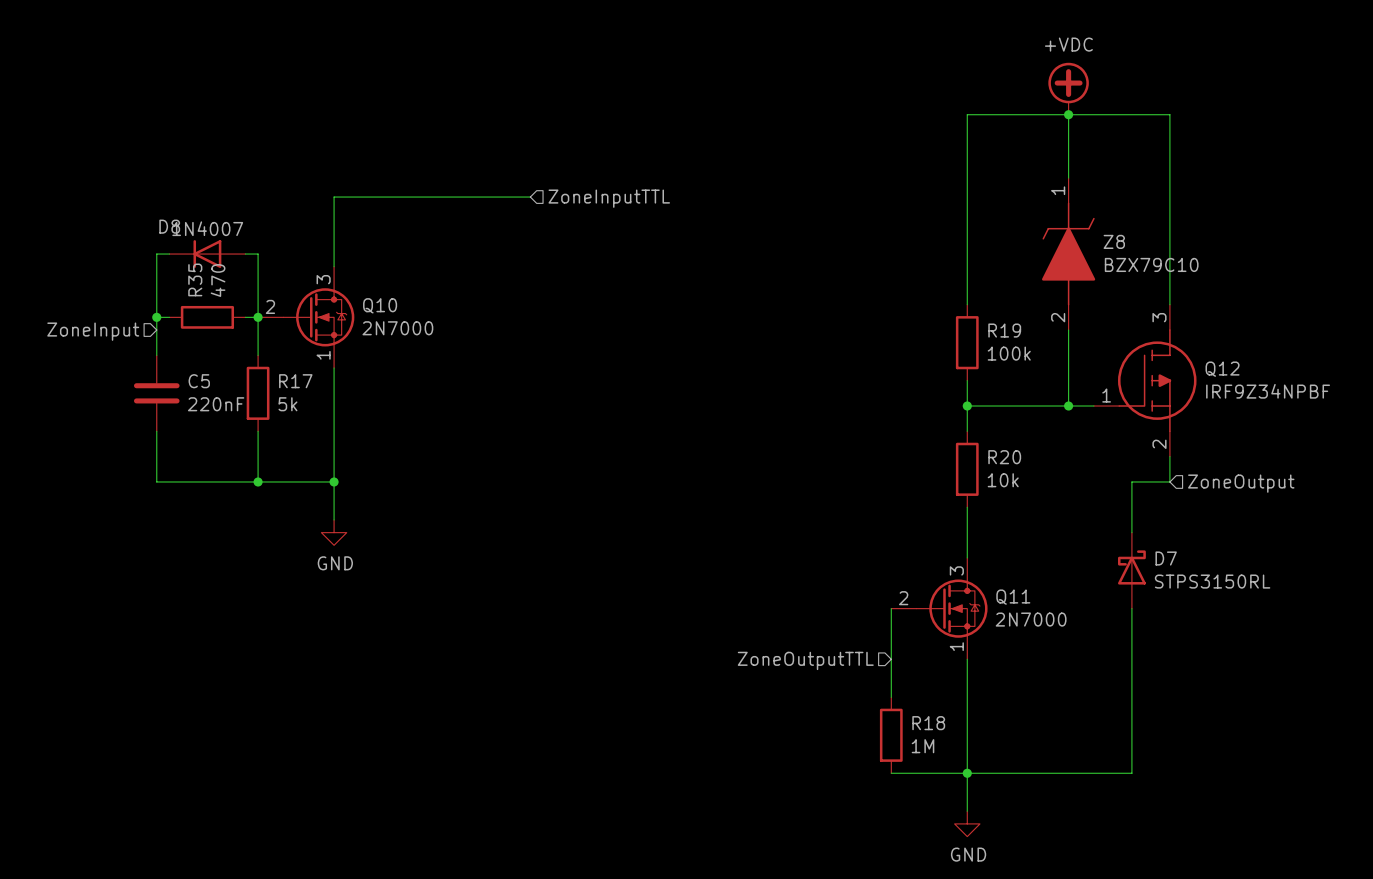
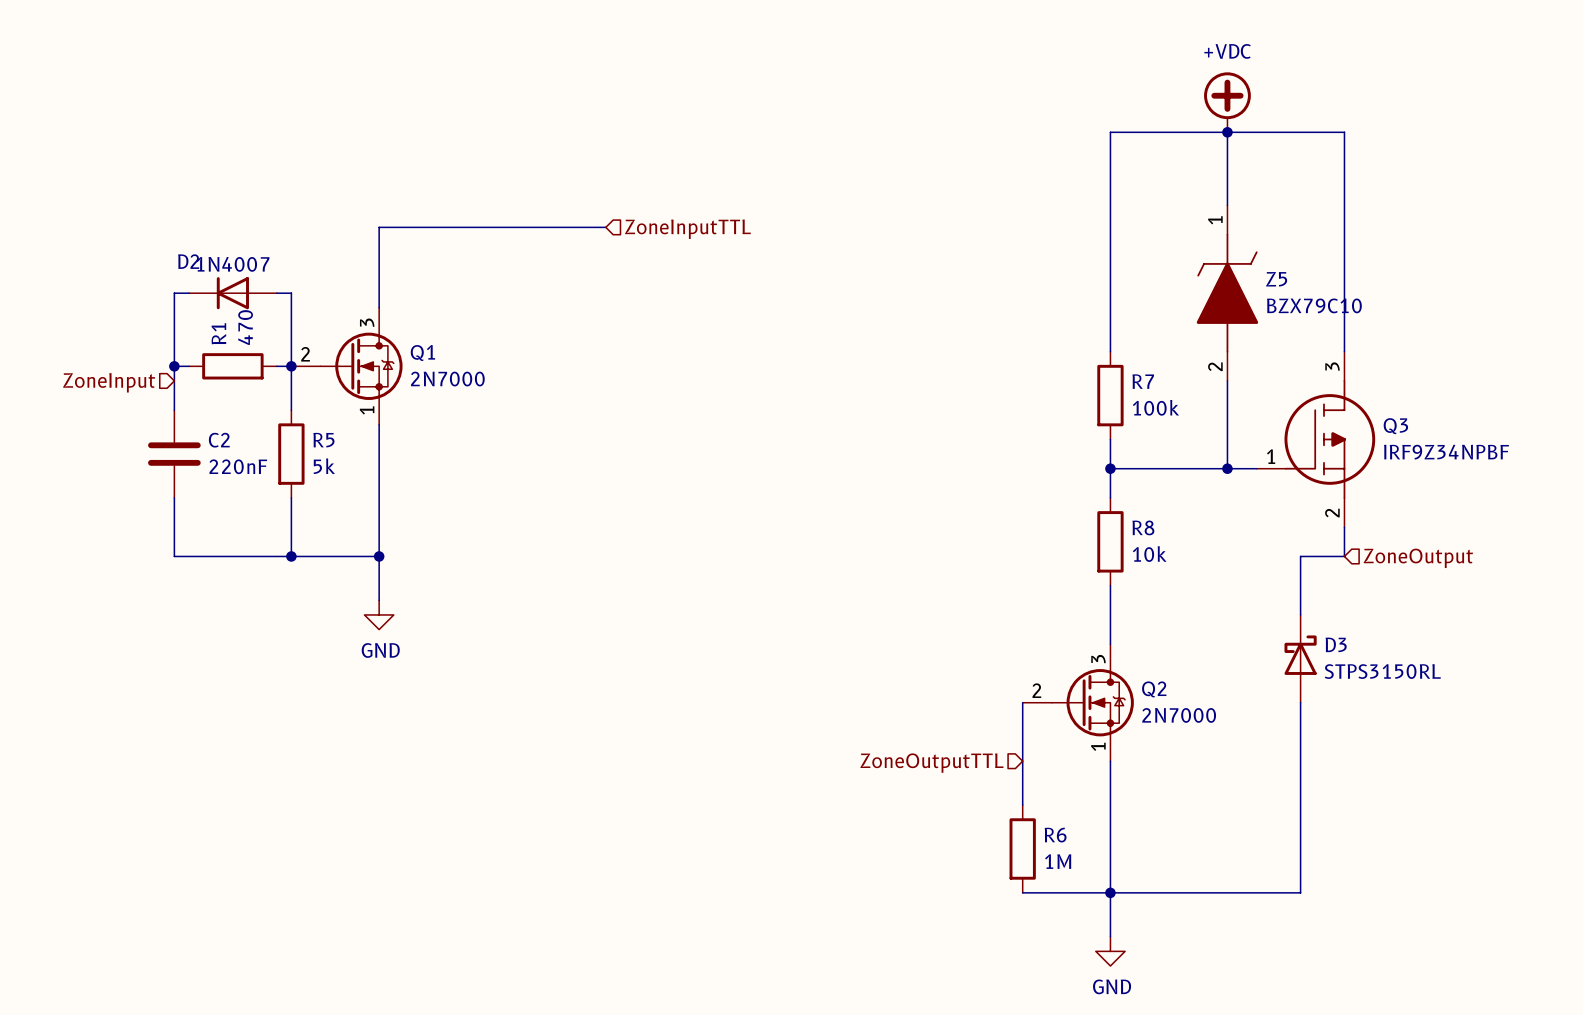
D8 name: D8 (169, 226) -> D2 (188, 261)
Z8 name: Z8 (1114, 241) -> Z5 (1276, 279)
R35 name: R35 (195, 279) -> R1 (218, 333)
Q10 name: Q10 (380, 305) -> Q1 (422, 353)
R19 name: R19 (1004, 330) -> R7 (1143, 381)
Q12 name: Q12 (1222, 369) -> Q3 (1395, 426)
C5 name: C5 (199, 381) -> C2 (219, 440)
R17 name: R17 (295, 381) -> R5 (323, 440)
R20 name: R20 (1004, 457) -> R8 (1143, 527)
D7 name: D7 (1166, 558) -> D3 (1336, 644)
Q11 name: Q11 (1013, 597) -> Q2 (1154, 689)
R18 name: R18 (928, 723) -> R6 (1055, 835)

